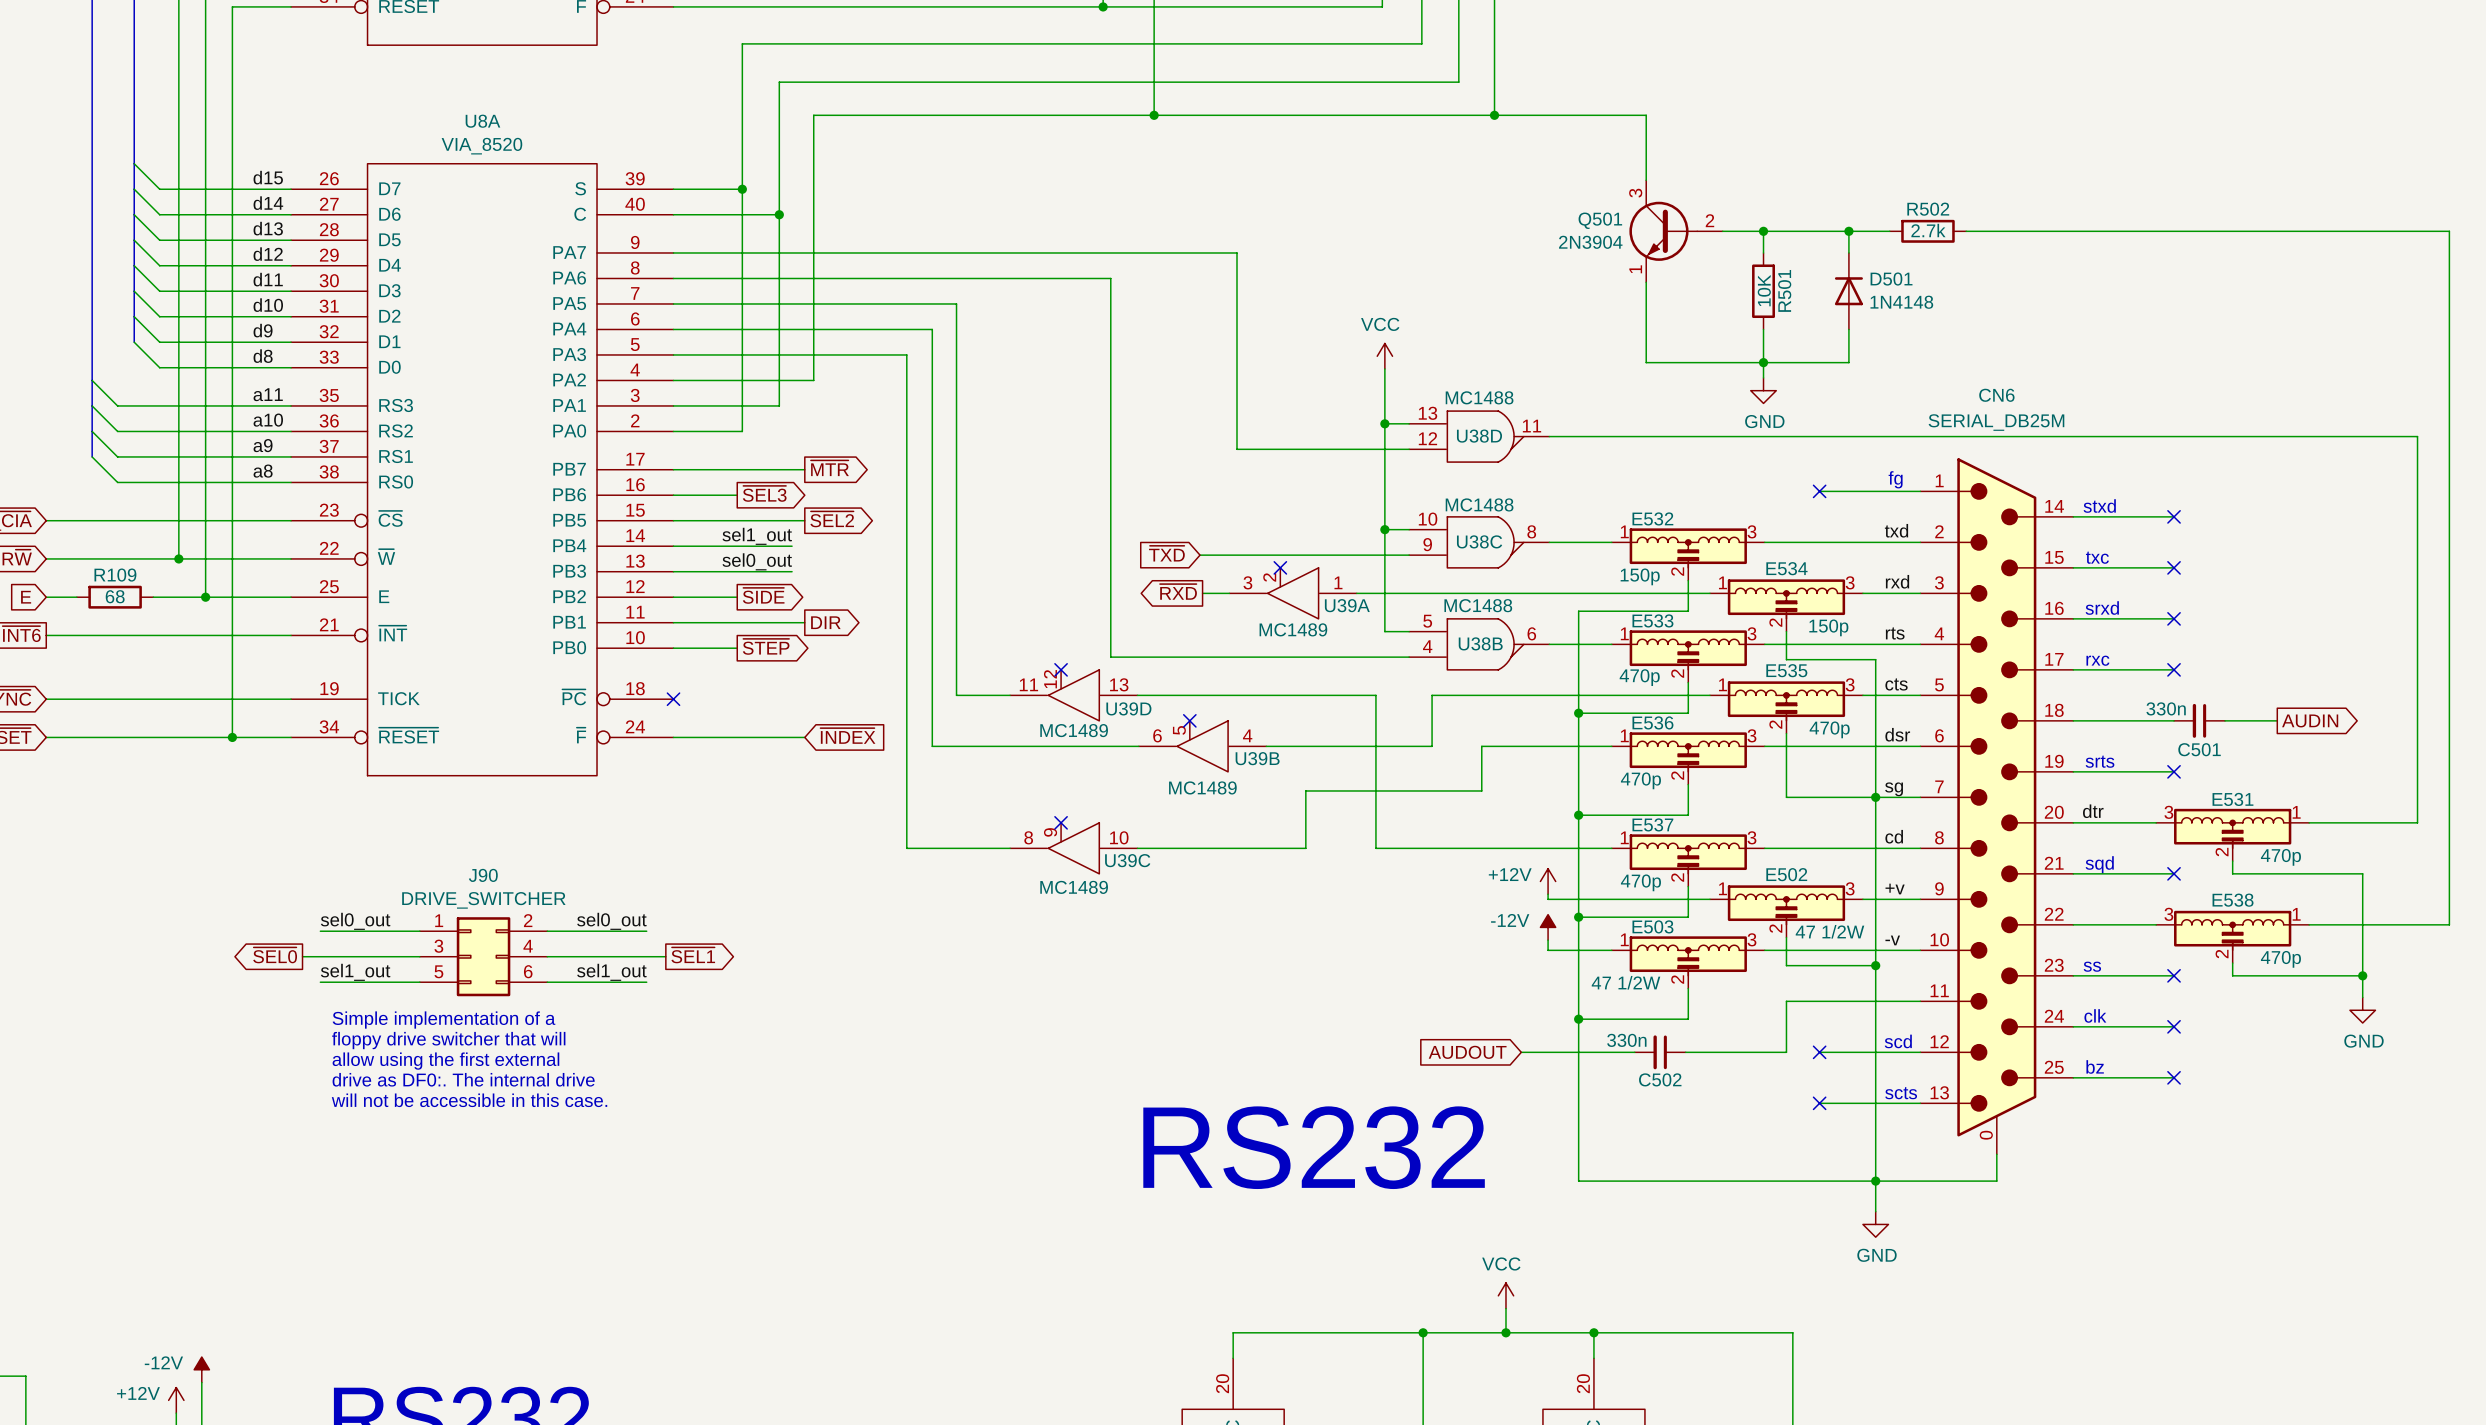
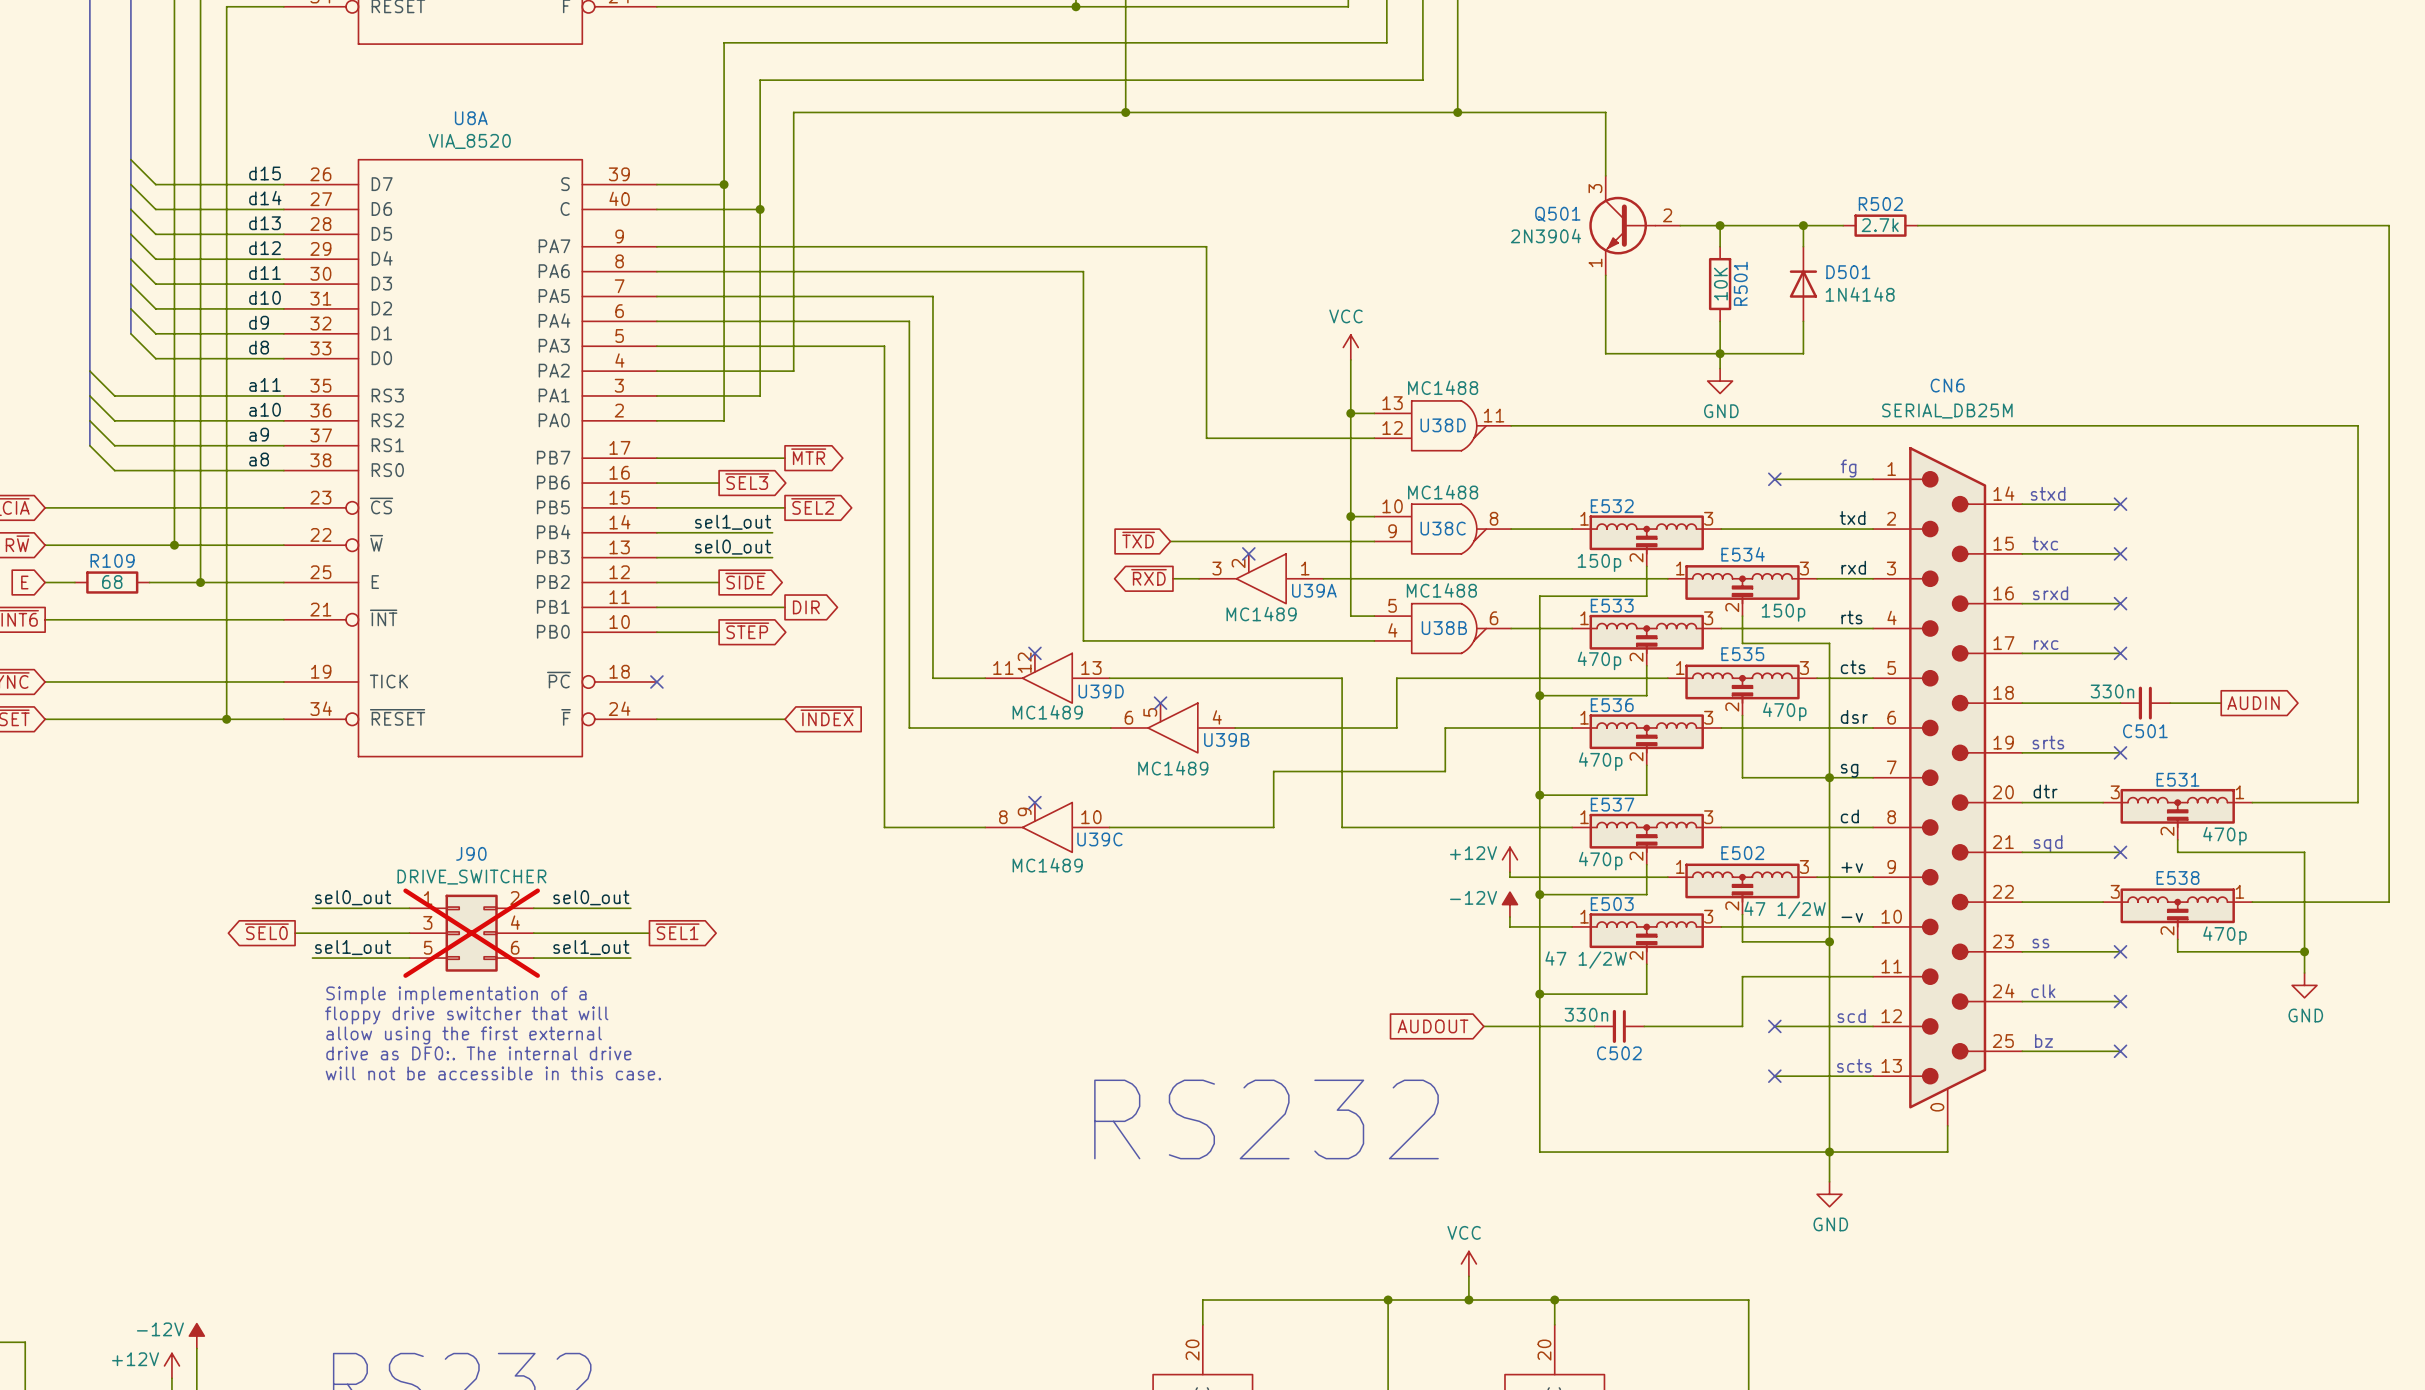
J90 do-not-place cross: none -> (471, 933)

